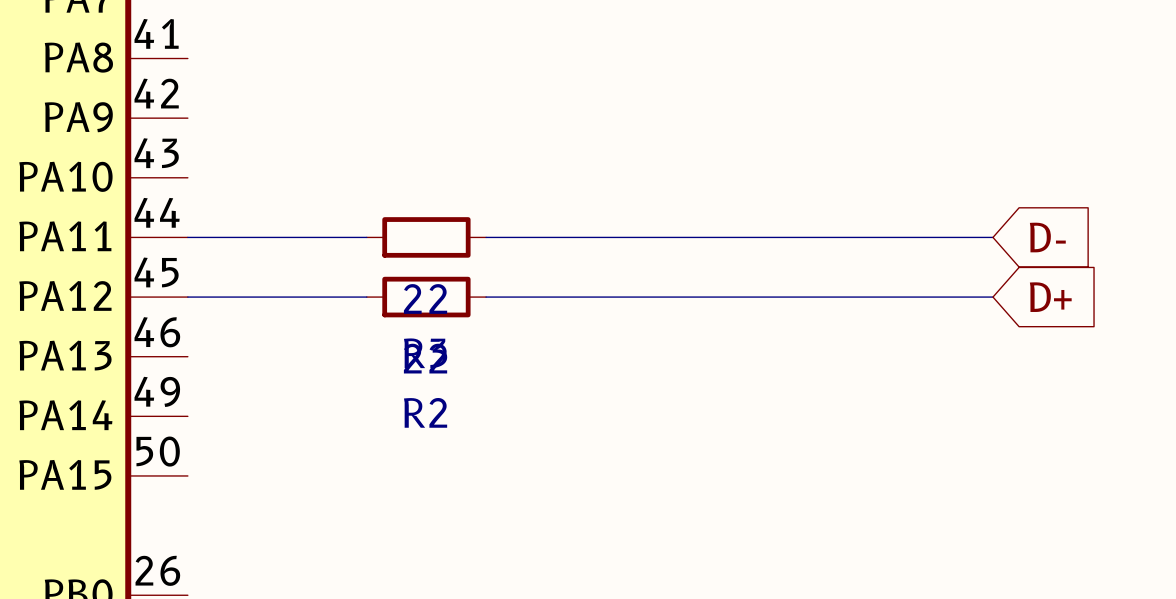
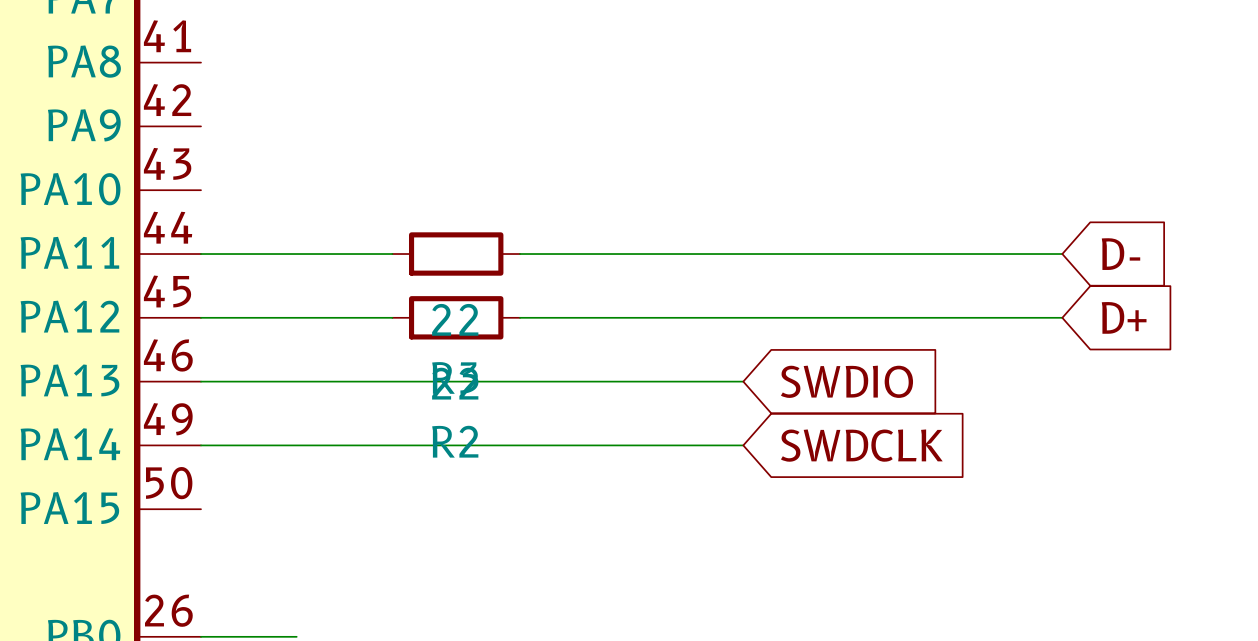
wire: none -> (200, 381) (743, 381)
global label: none -> SWDIO (846, 381)
wire: none -> (200, 445) (743, 445)
global label: none -> SWDCLK (861, 445)
wire: none -> (200, 636) (296, 636)

